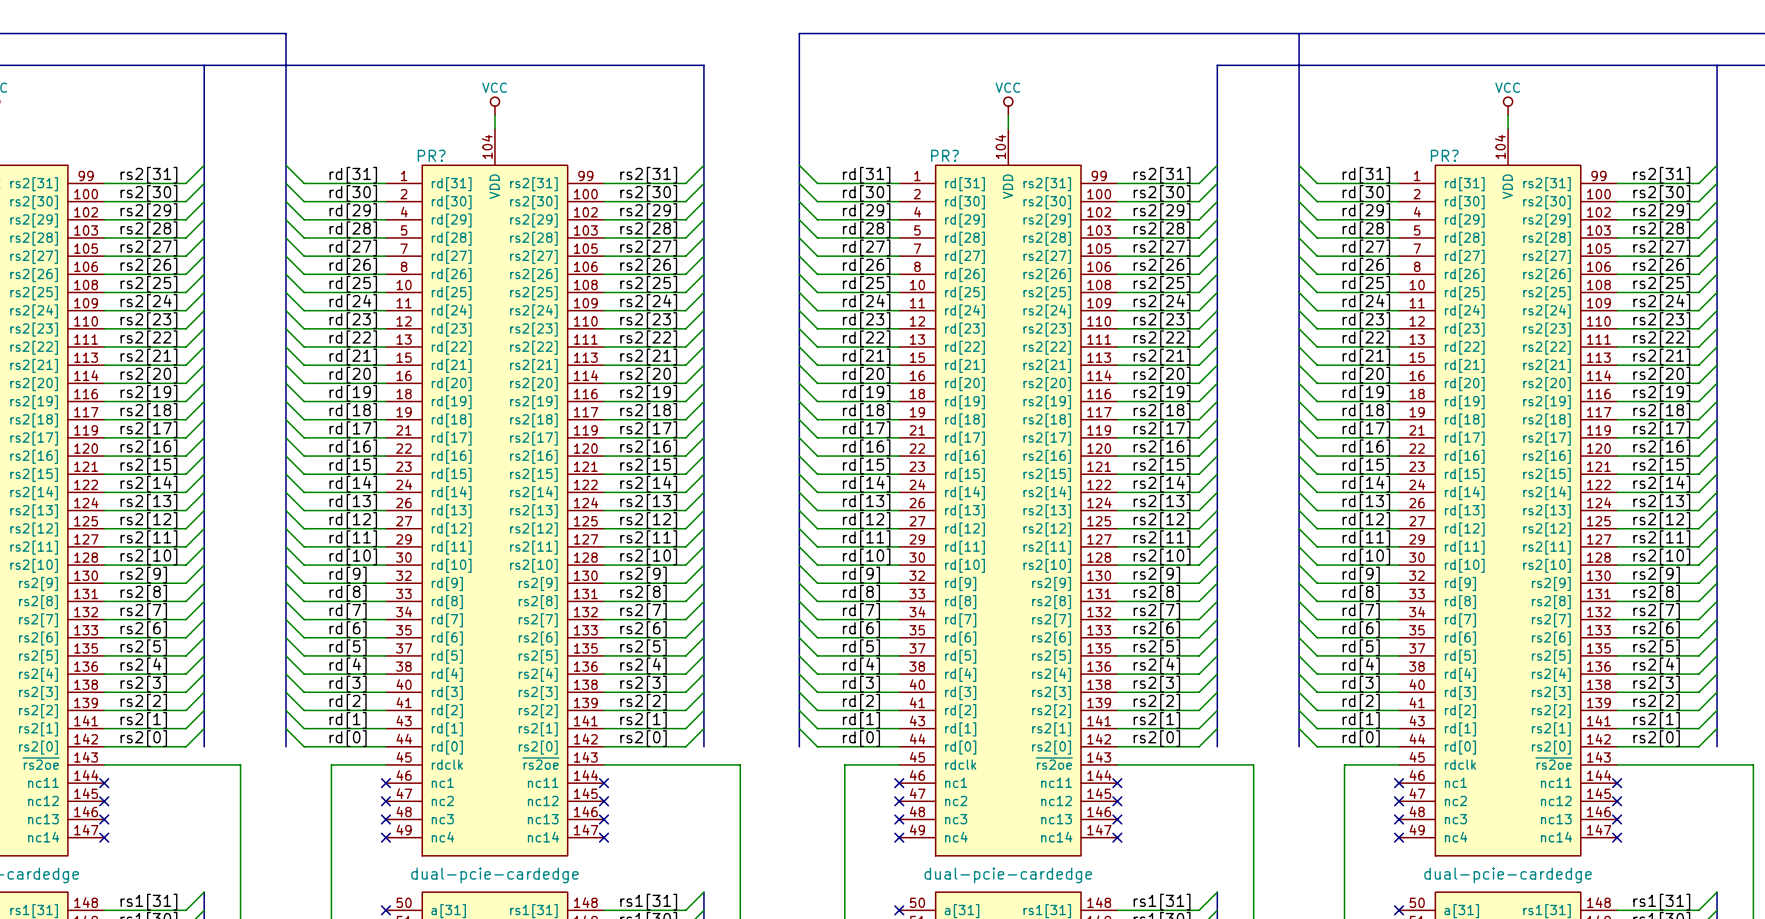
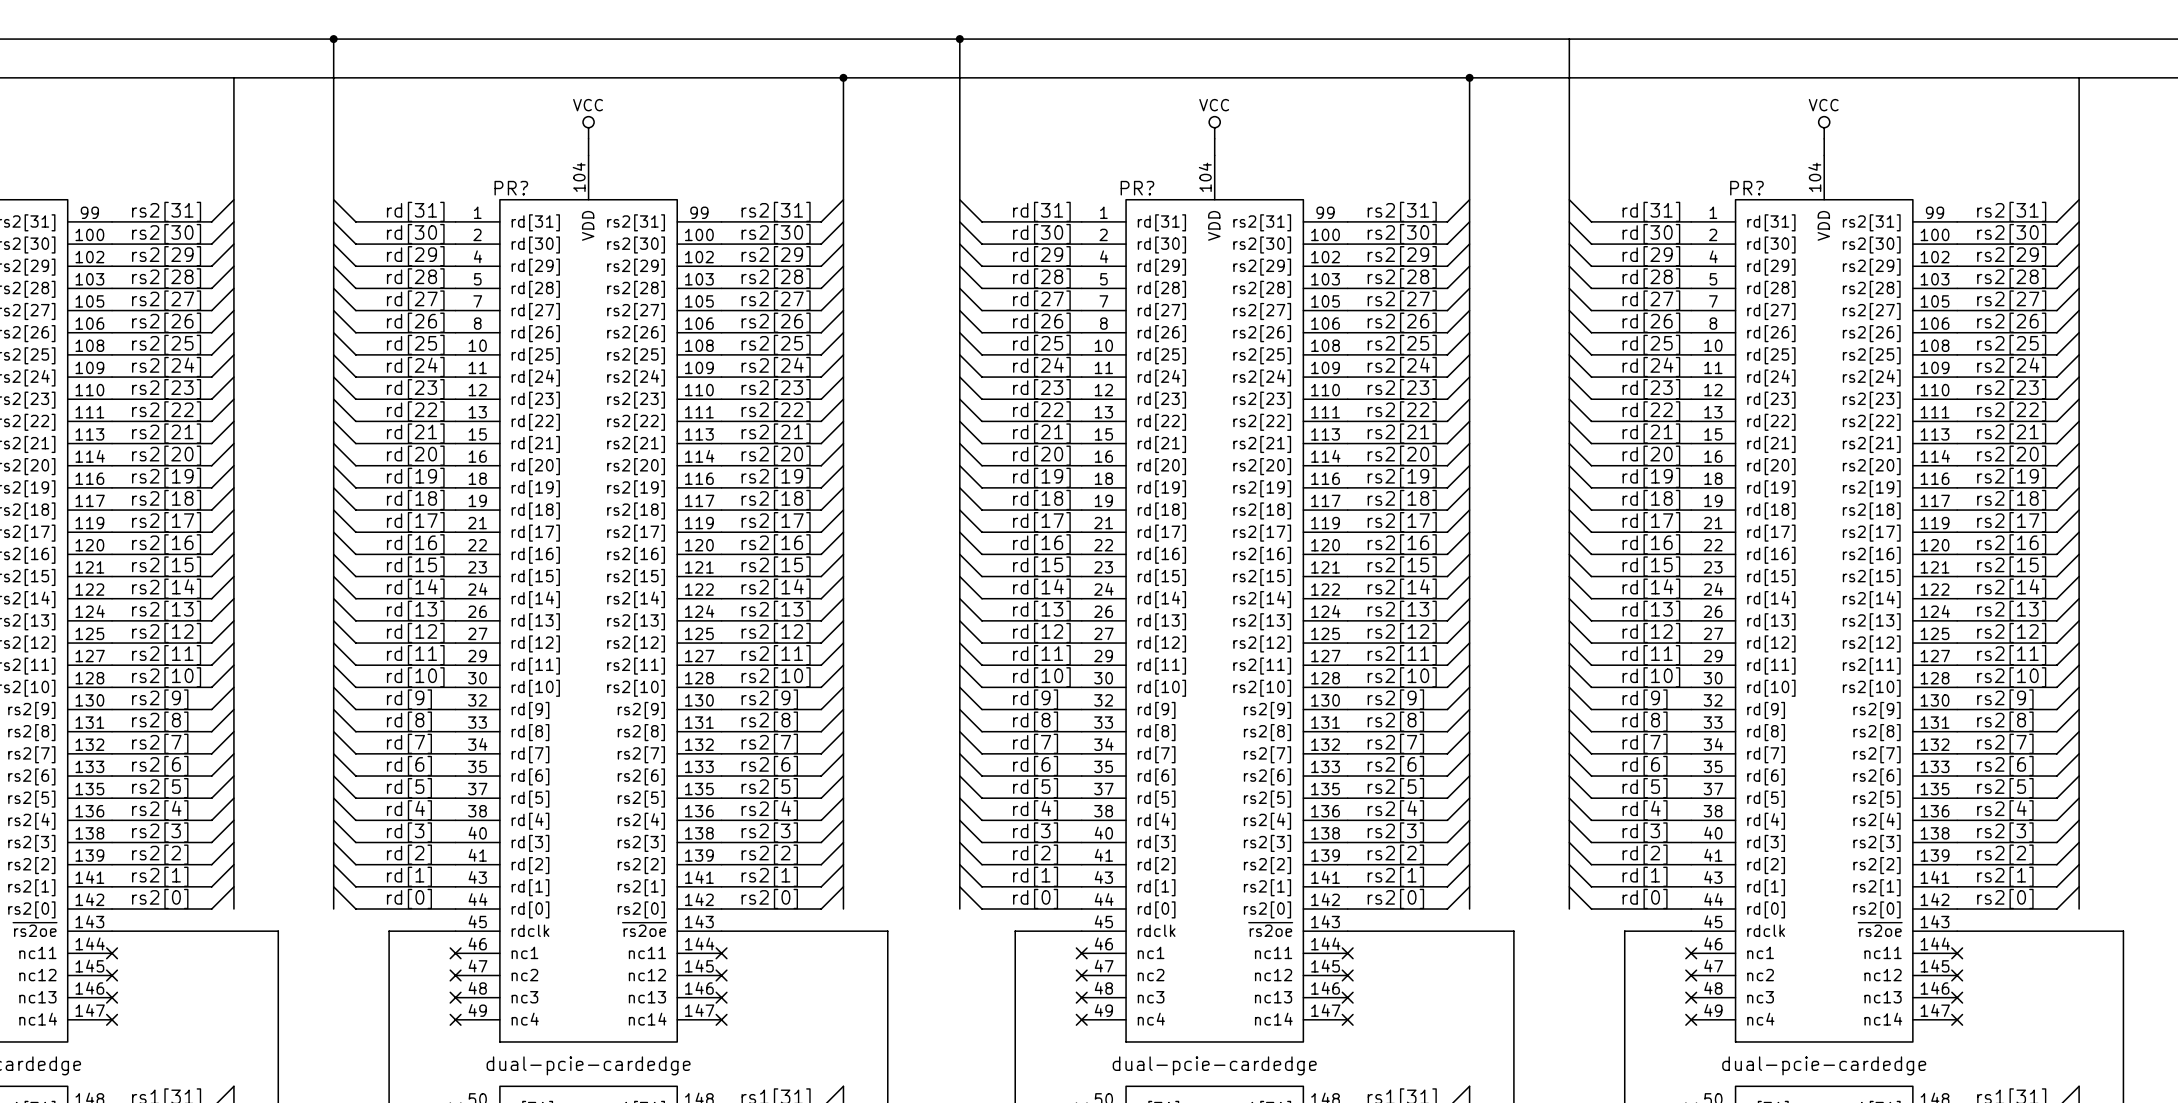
bus: none -> (333, 39) (959, 39)
junction: none -> (333, 39)
junction: none -> (959, 39)
bus: none -> (843, 77) (1469, 77)
junction: none -> (843, 77)
junction: none -> (1469, 77)

